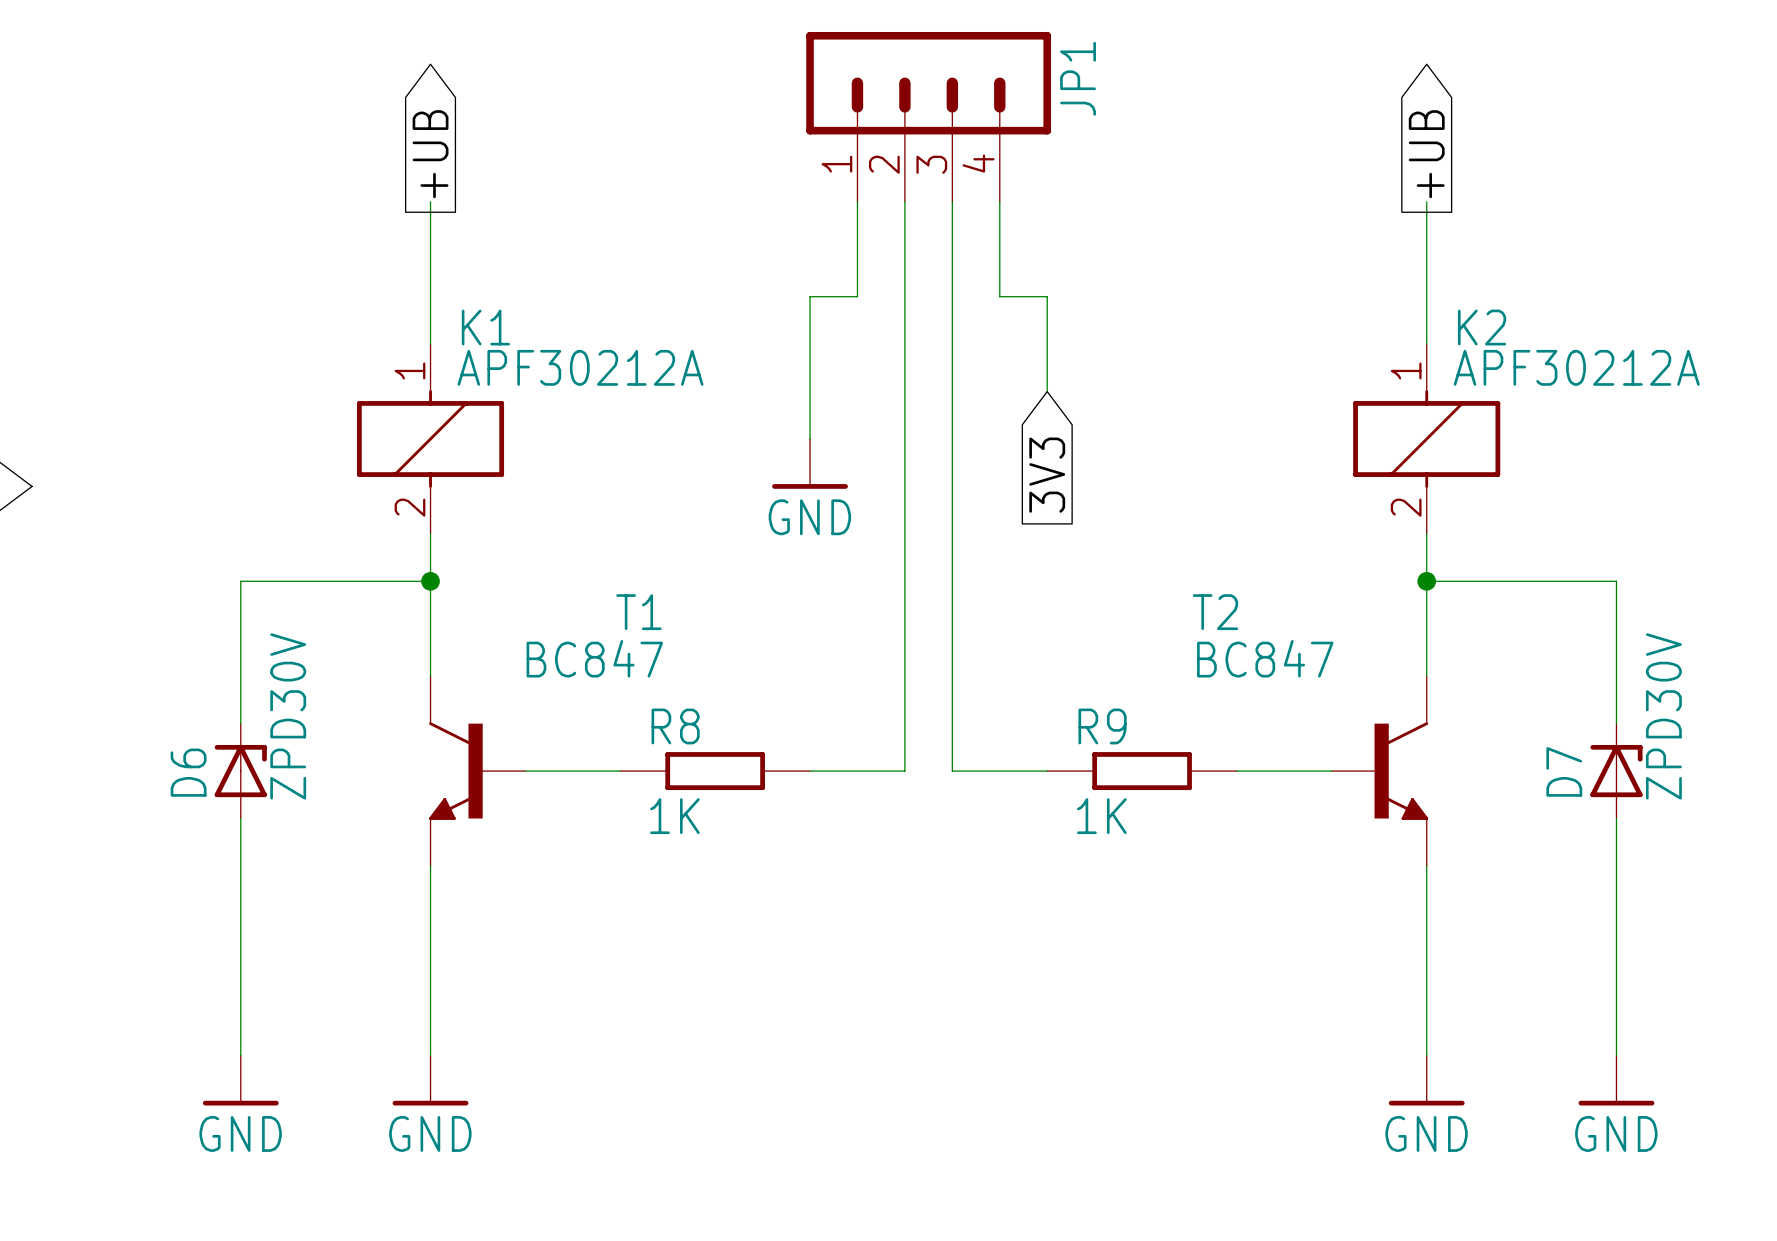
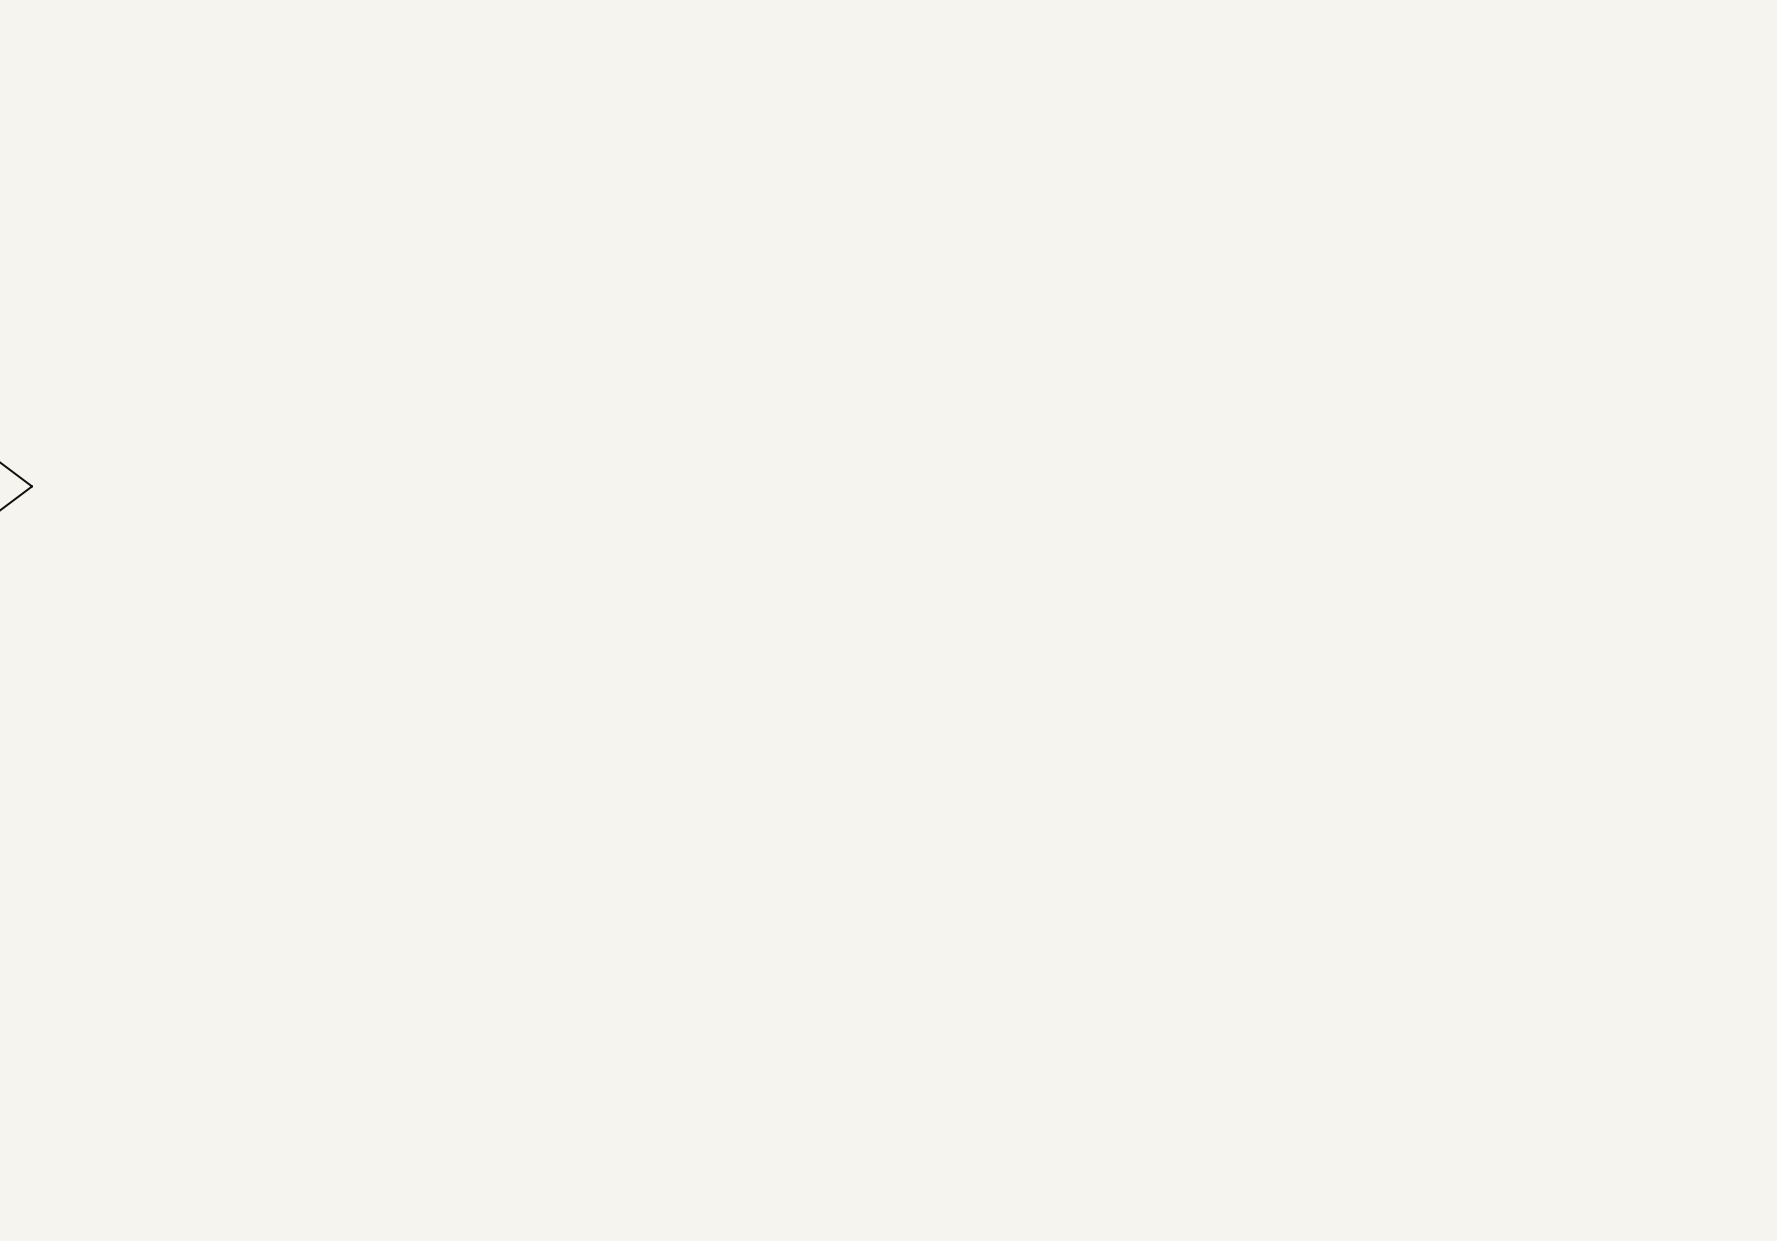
JP1: (928, 116) -> none
global label: +UB (430, 154) -> none
global label: +UB (1426, 154) -> none
wire: (430, 201) (430, 344) -> none
wire: (857, 201) (857, 296) (810, 296) (810, 439) -> none
wire: (904, 201) (904, 771) (810, 771) -> none
wire: (952, 201) (952, 771) (1047, 771) -> none
wire: (999, 201) (999, 296) (1047, 296) (1047, 391) -> none
wire: (1426, 201) (1426, 344) -> none
K1: APF30212A (430, 439) -> none
K2: APF30212A (1426, 439) -> none
power symbol: GND (810, 463) -> none
global label: 3V3 (1047, 475) -> none
wire: (430, 533) (430, 676) -> none
wire: (1426, 533) (1426, 676) -> none
wire: (430, 581) (240, 581) (240, 723) -> none
junction: (430, 581) -> none
wire: (1426, 581) (1616, 581) (1616, 723) -> none
junction: (1426, 581) -> none
D6: ZPD30V (240, 771) -> none
T1: BC847 (477, 771) -> none
wire: (525, 771) (620, 771) -> none
R8: 1K (715, 771) -> none
R9: 1K (1142, 771) -> none
wire: (1236, 771) (1331, 771) -> none
T2: BC847 (1379, 771) -> none
D7: ZPD30V (1616, 771) -> none
wire: (240, 818) (240, 1055) -> none
wire: (1616, 818) (1616, 1055) -> none
wire: (430, 865) (430, 1055) -> none
wire: (1426, 865) (1426, 1055) -> none
power symbol: GND (240, 1080) -> none
power symbol: GND (430, 1080) -> none
power symbol: GND (1426, 1080) -> none
power symbol: GND (1616, 1080) -> none

